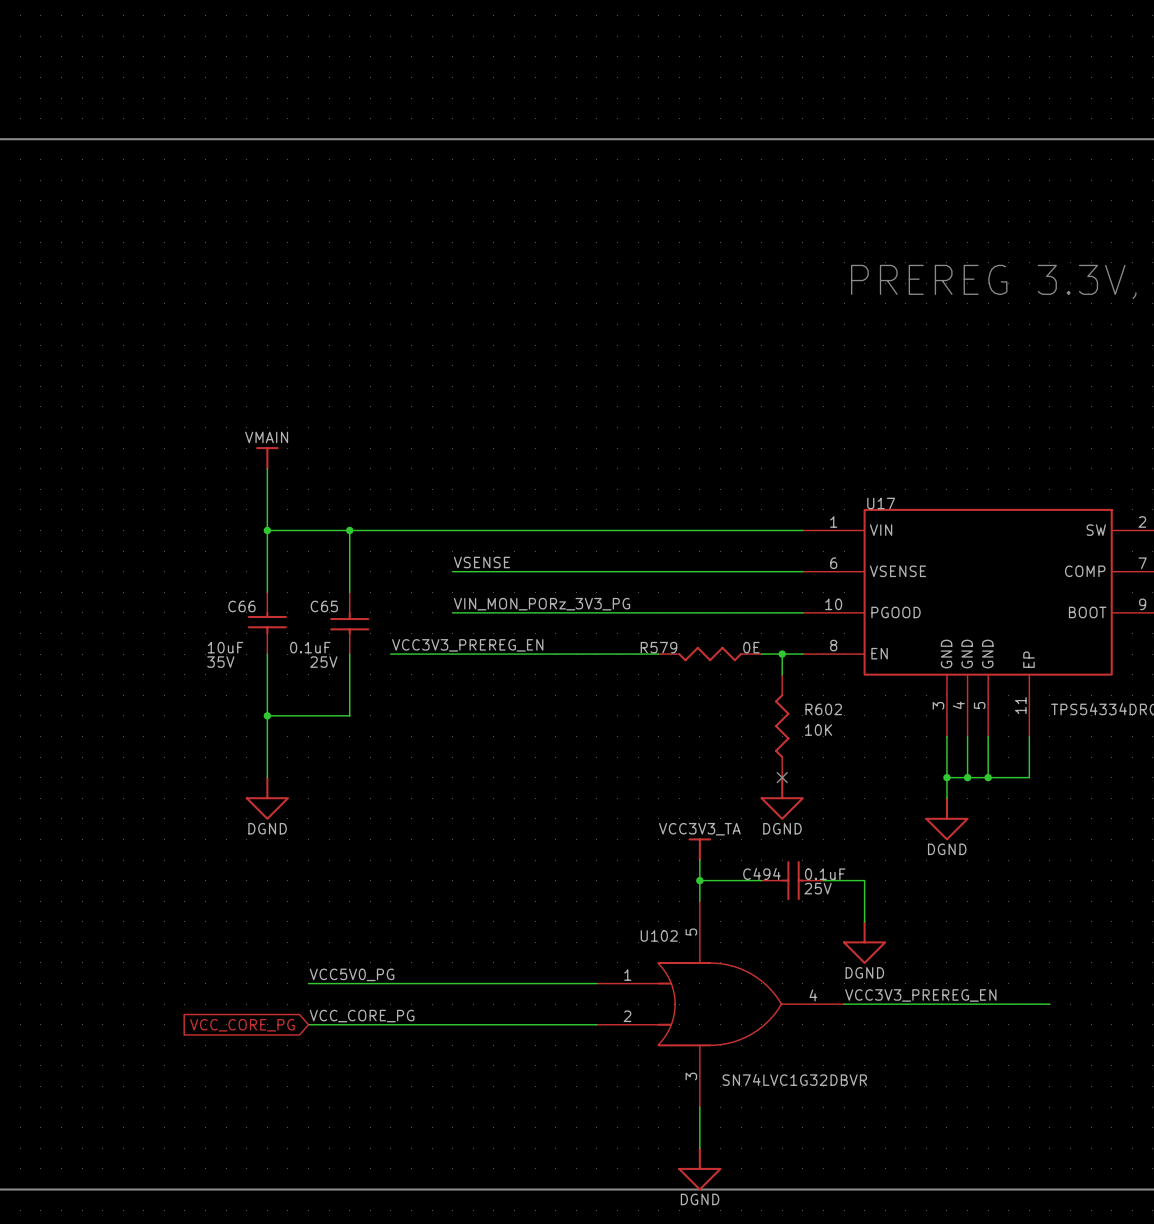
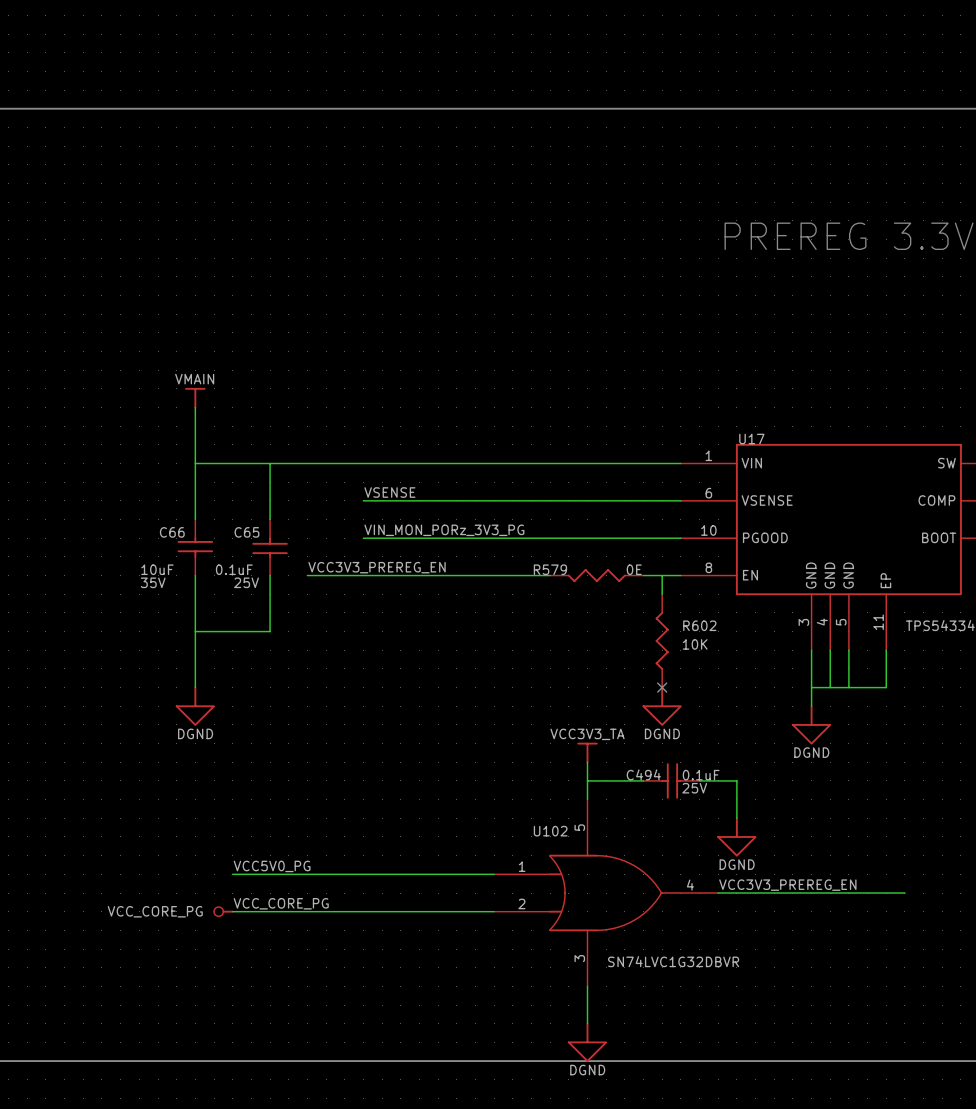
junction: (267, 530) -> none
junction: (349, 530) -> none
junction: (782, 654) -> none
junction: (267, 715) -> none
junction: (946, 777) -> none
junction: (967, 777) -> none
junction: (988, 777) -> none
junction: (699, 880) -> none
power symbol: none -> VCC_CORE_PG (223, 911)
global label: VCC_CORE_PG (242, 1025) -> none

